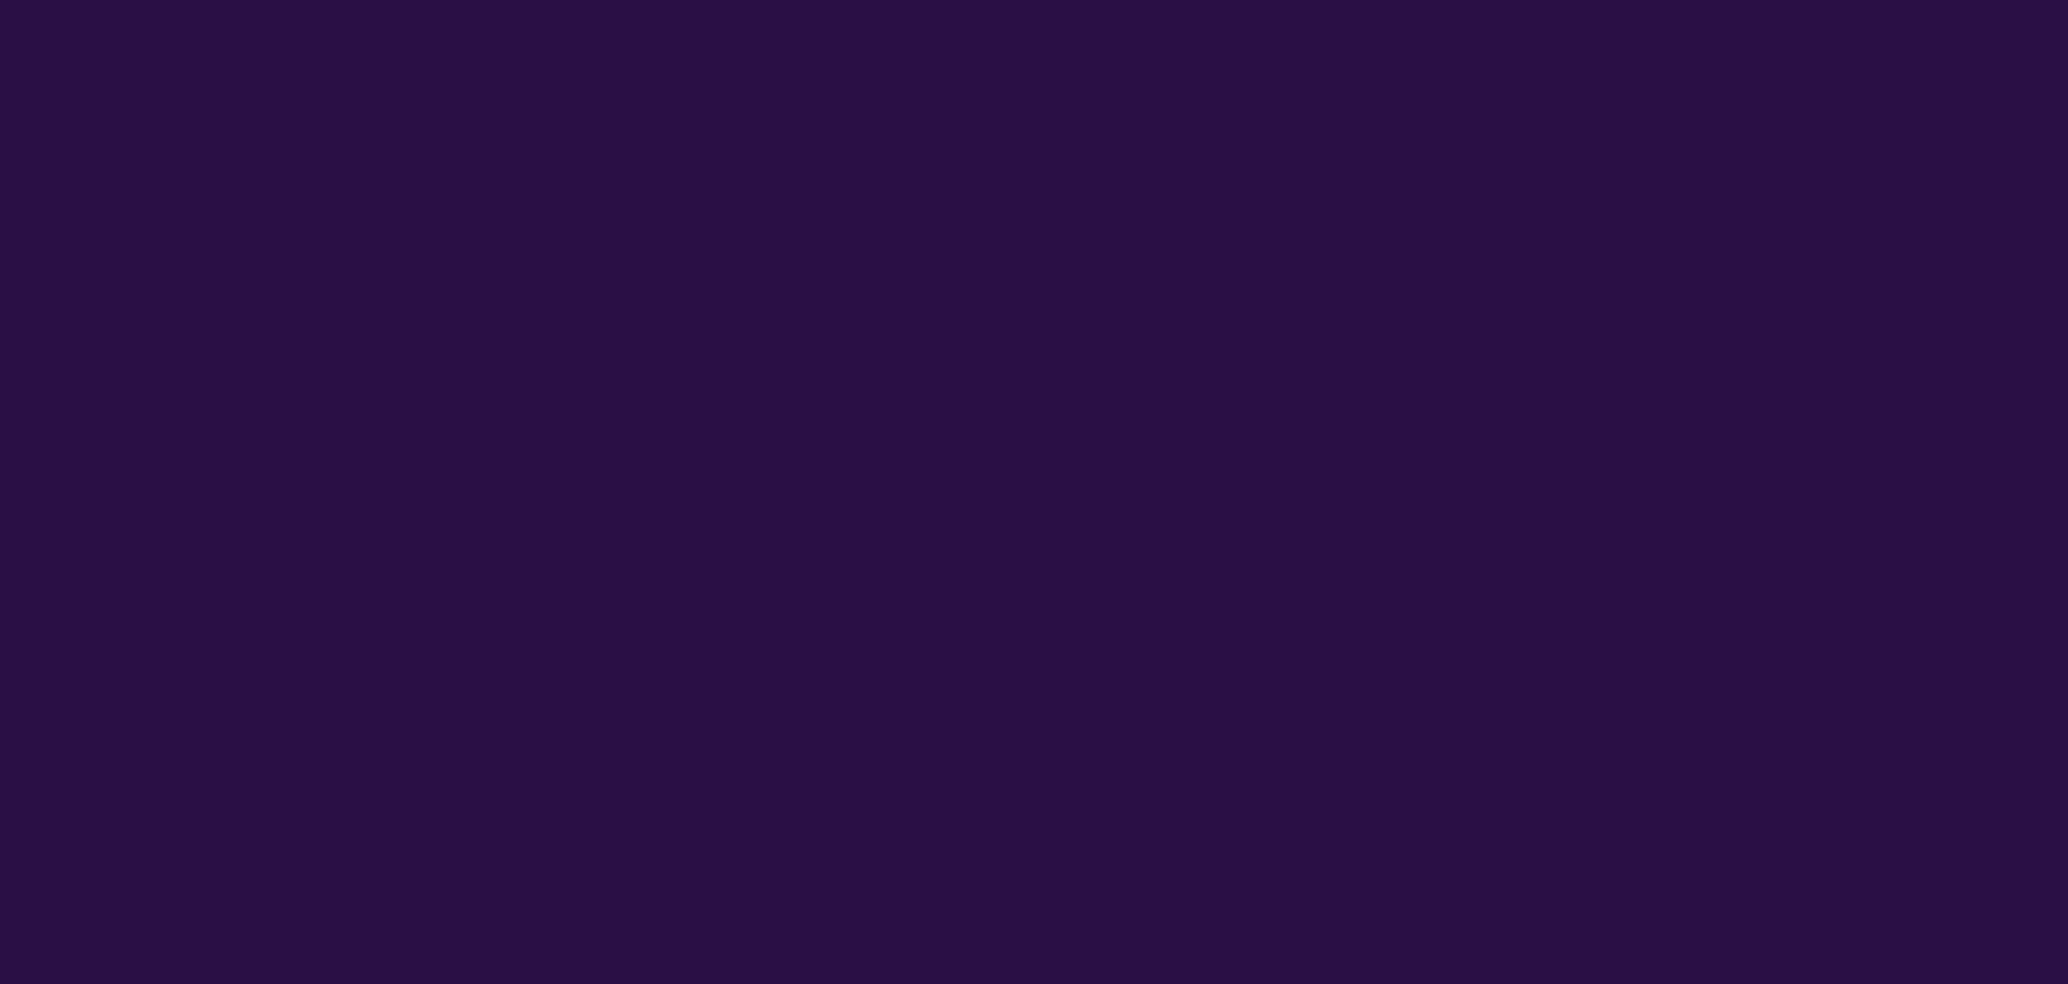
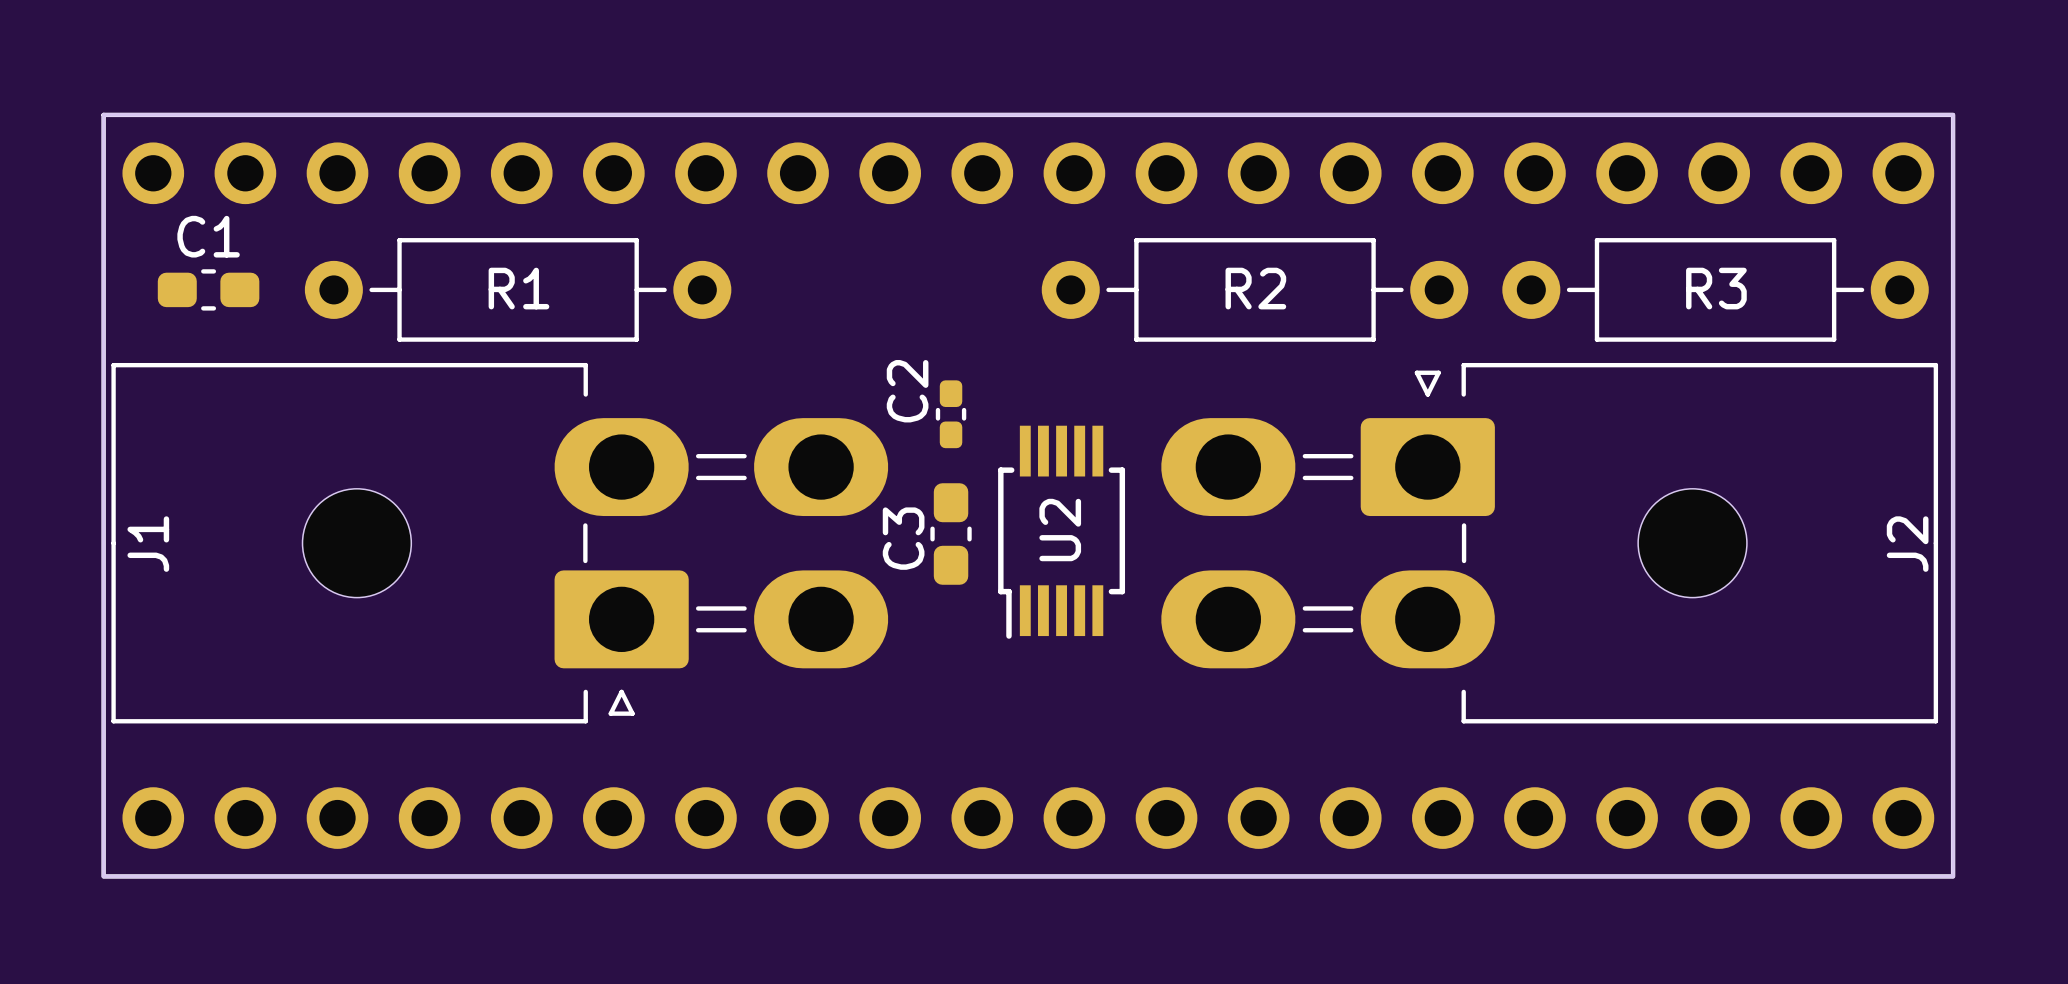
board edge: none -> (103, 114) (1953, 114) (1953, 876) (103, 876) (103, 114)
C1: none -> (208, 289)
R1: none -> (518, 289)
R2: none -> (1255, 289)
R3: none -> (1715, 289)
C2: none -> (951, 414)
part: none -> (1028, 495)
U2: none -> (1061, 532)
C3: none -> (951, 534)
J1: none -> (499, 543)
J2: none -> (1549, 543)

